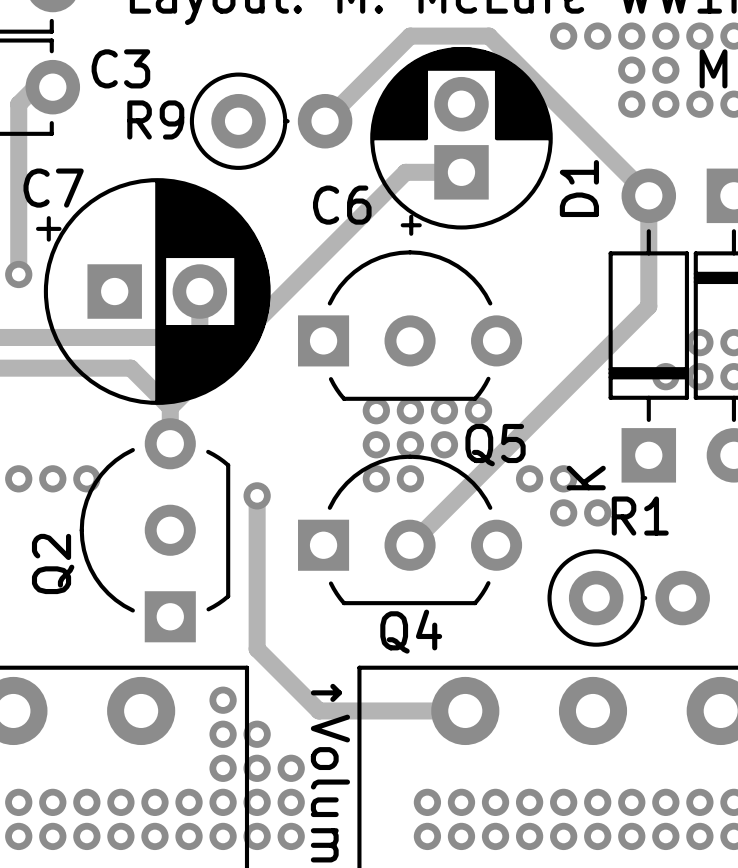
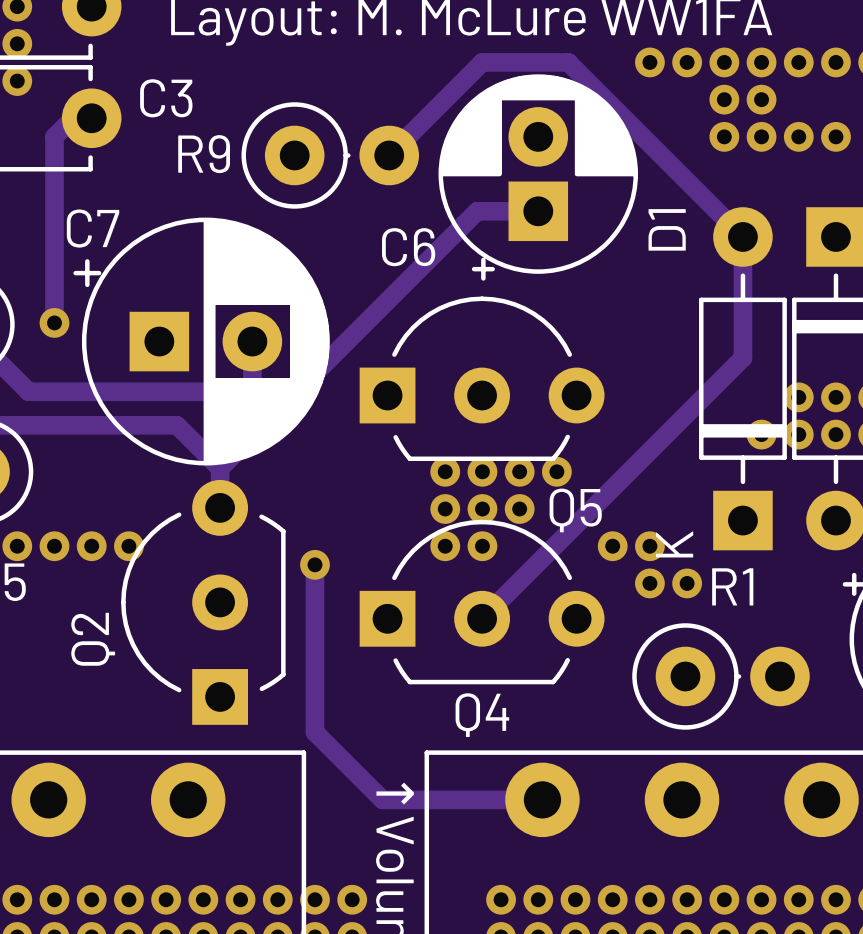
via: (223, 700) -> none
via: (223, 734) -> none
via: (257, 734) -> none
via: (223, 768) -> none
via: (257, 768) -> none
via: (291, 768) -> none

